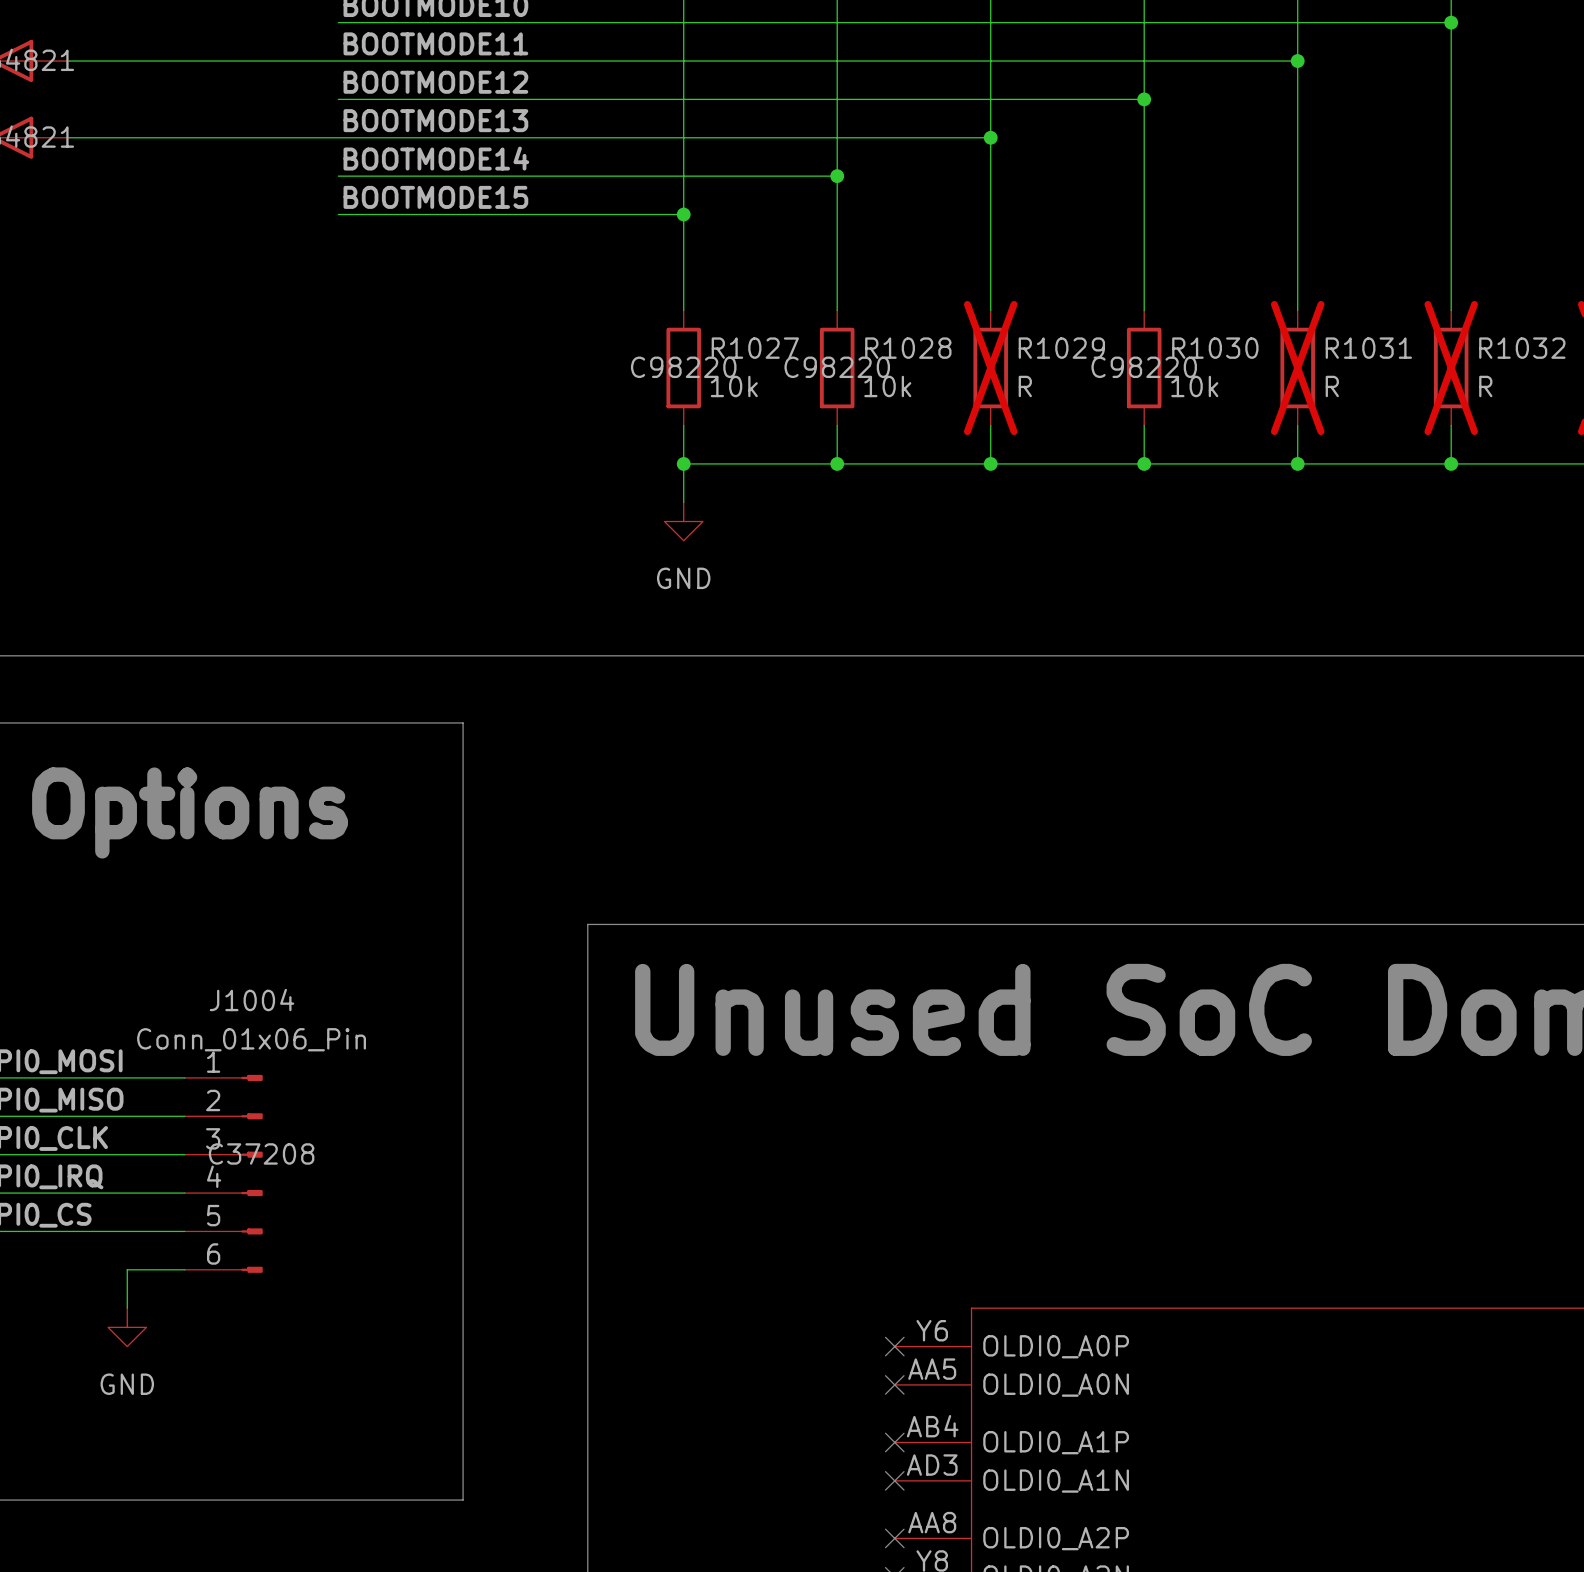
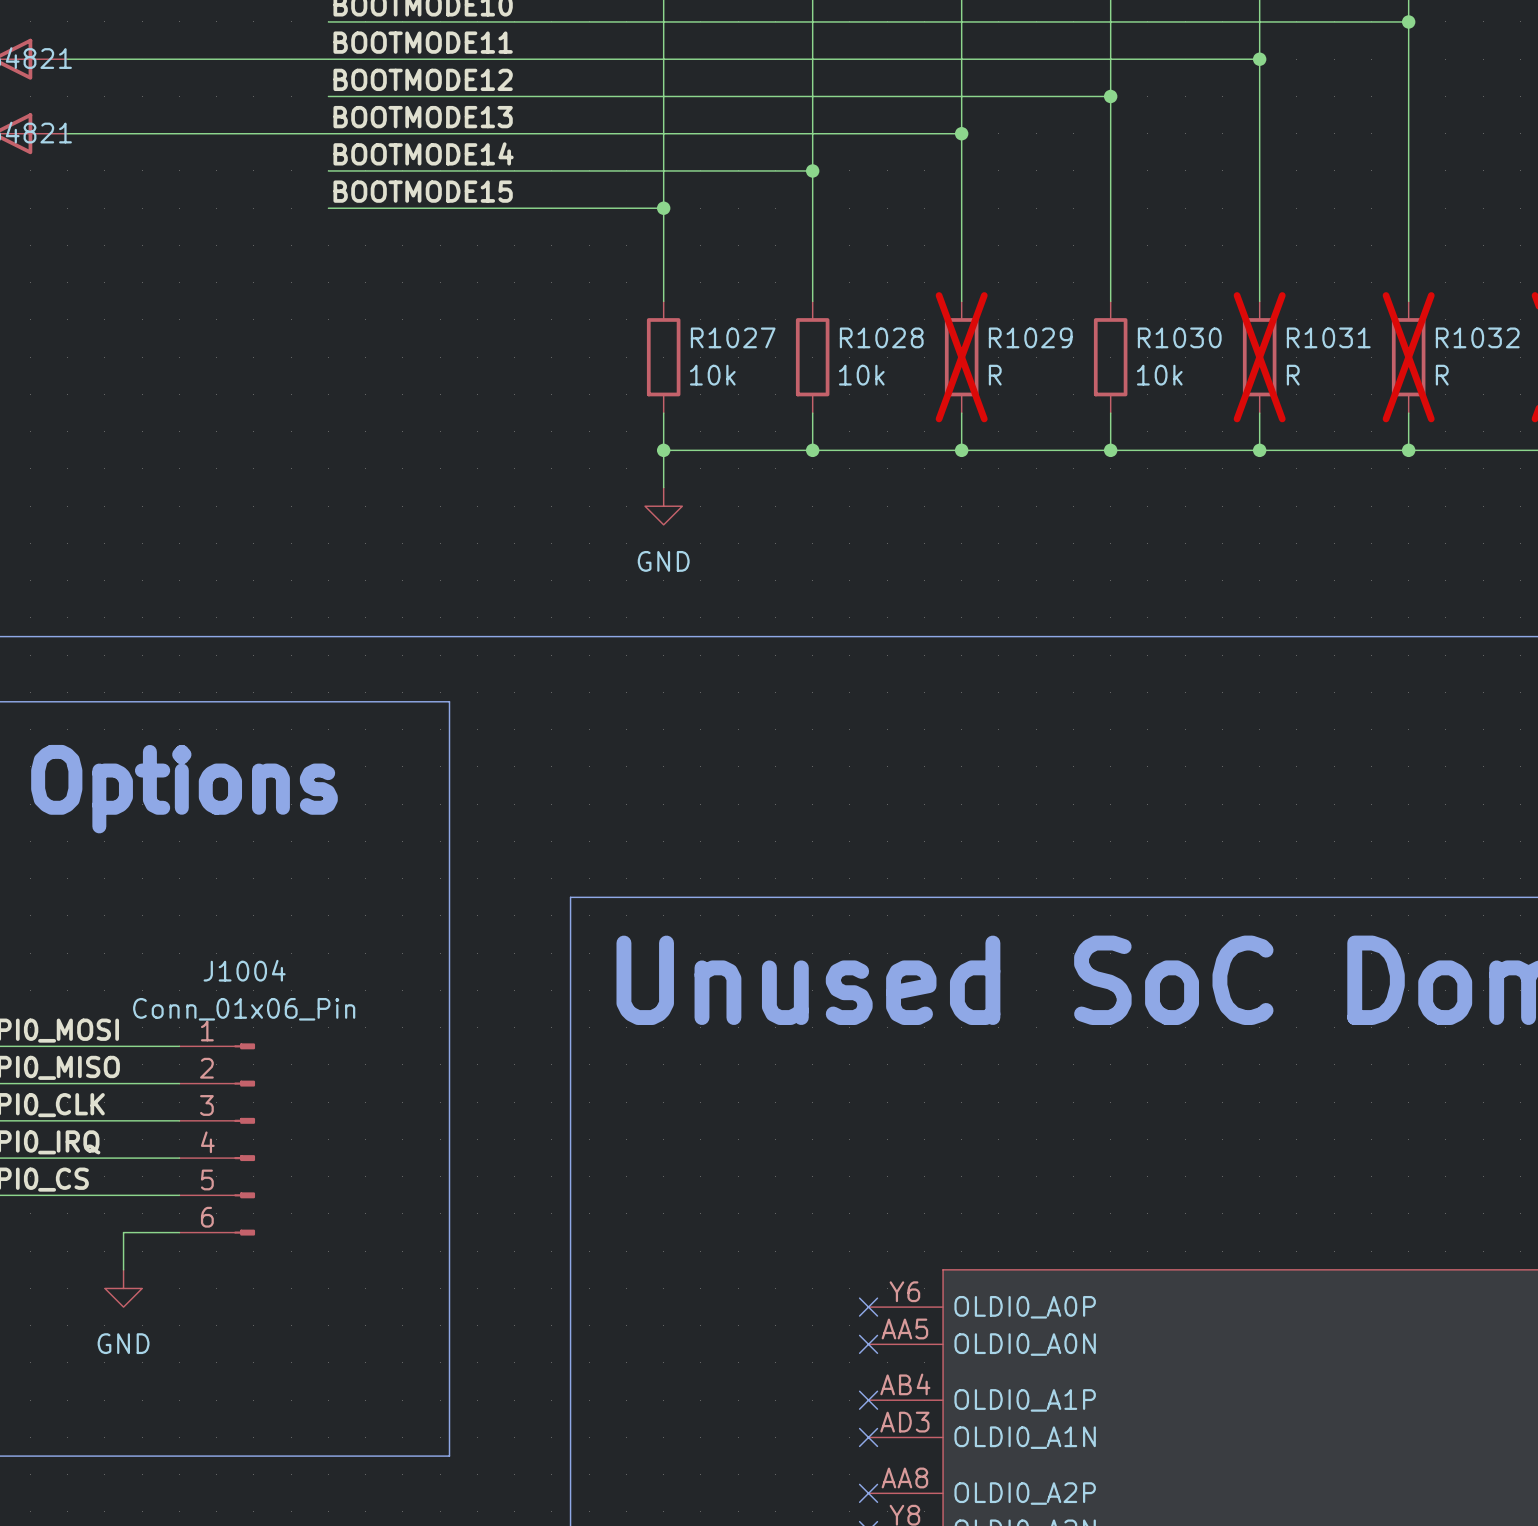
R1027 text: C98220 (683, 367) -> none
R1028 text: C98220 (837, 367) -> none
R1030 text: C98220 (1144, 367) -> none
J1004 text: C37208 (261, 1153) -> none

